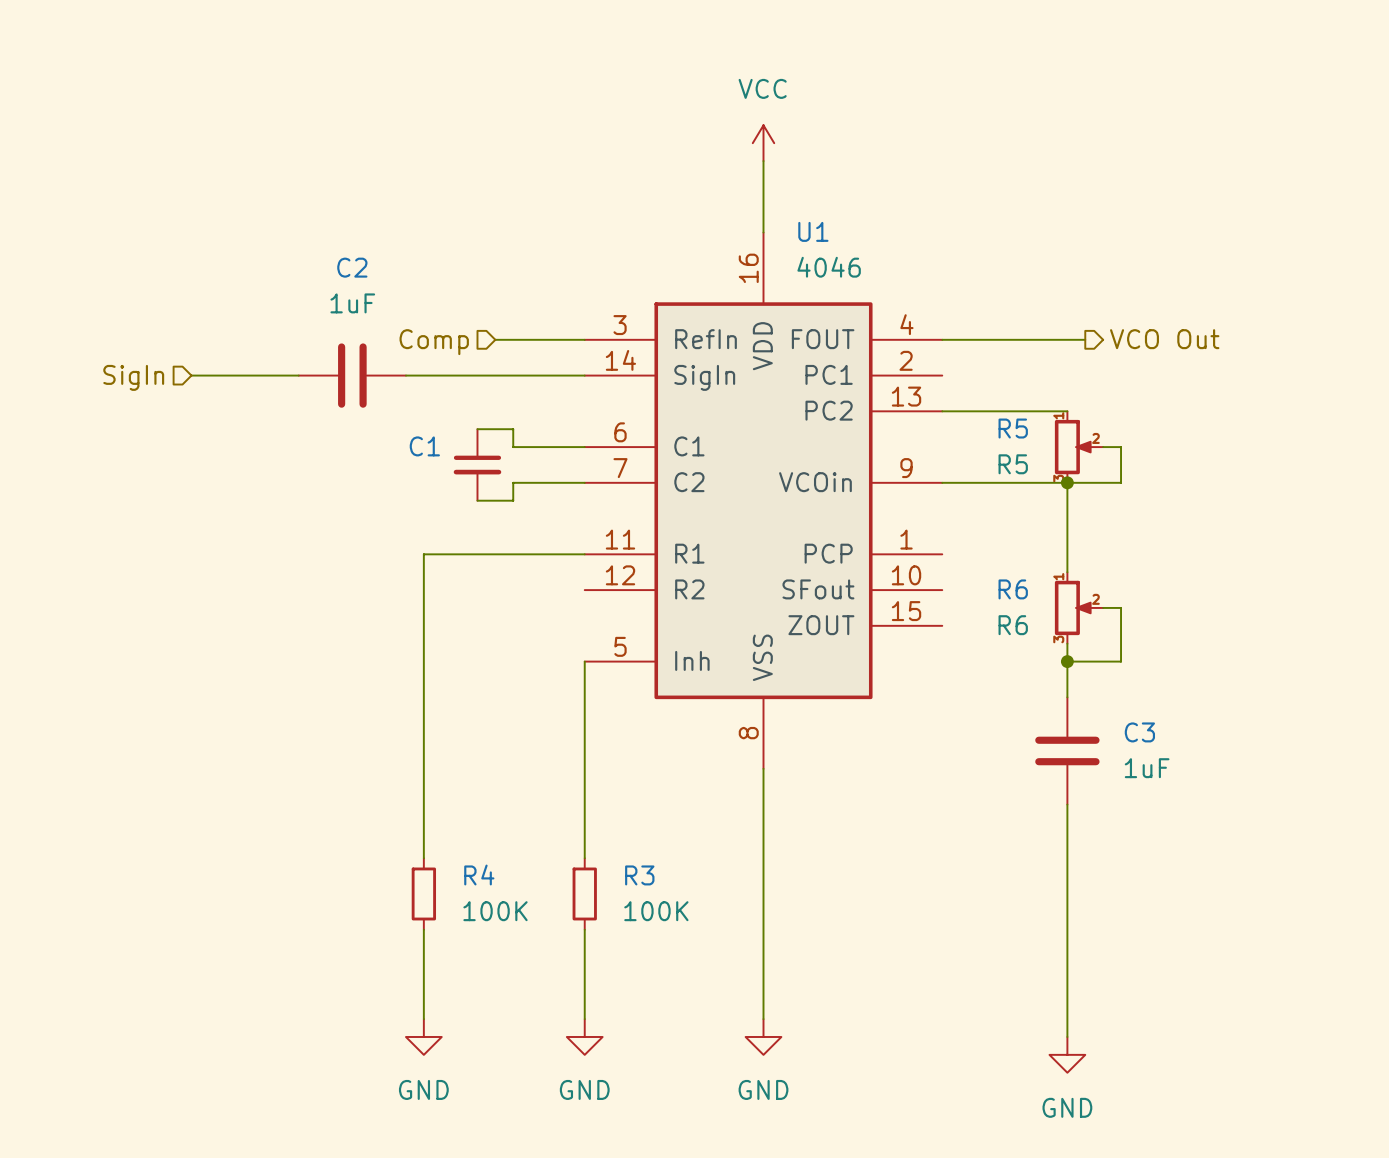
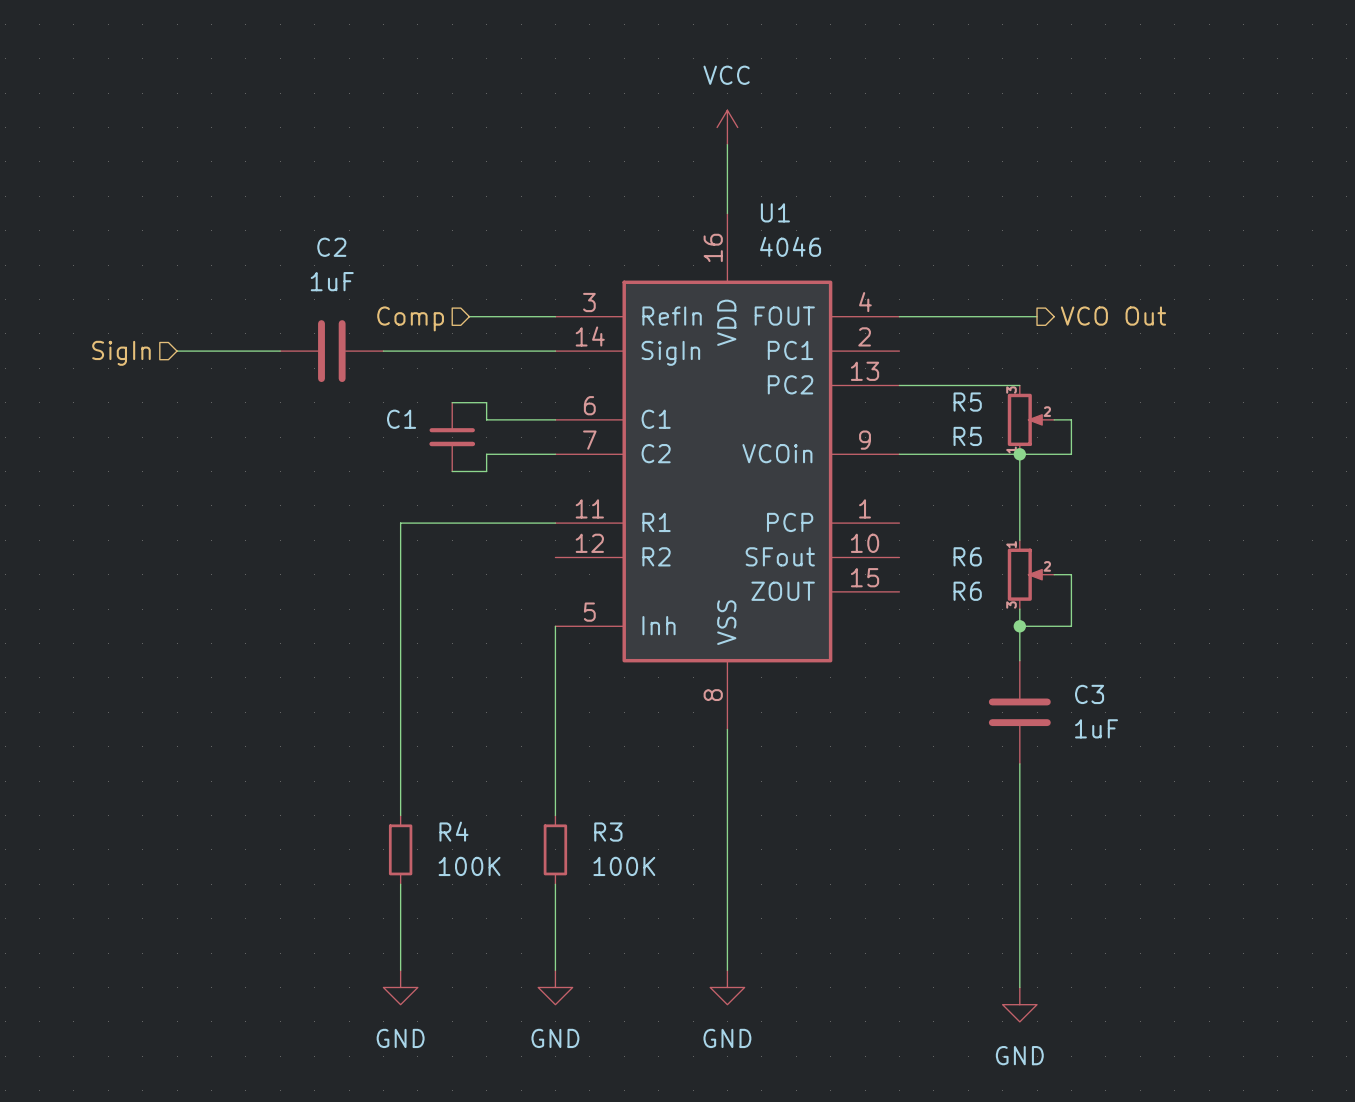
R5 flip: as is (1072, 447) -> up-down (1024, 419)

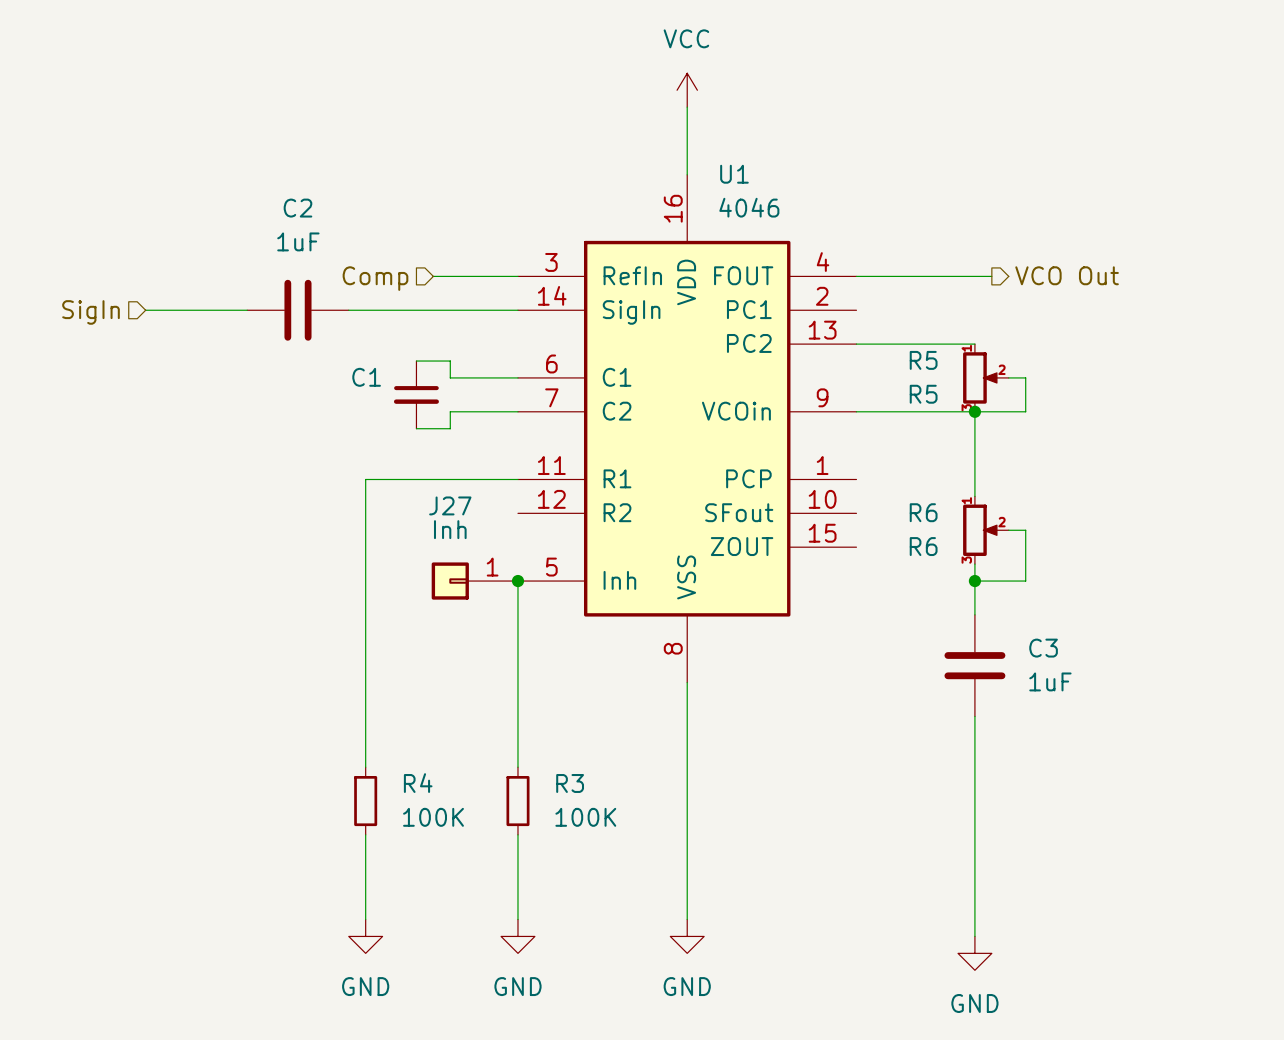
R5 flip: as is (1024, 419) -> up-down (980, 377)
J27: none -> Inh (474, 581)
junction: none -> (517, 581)

